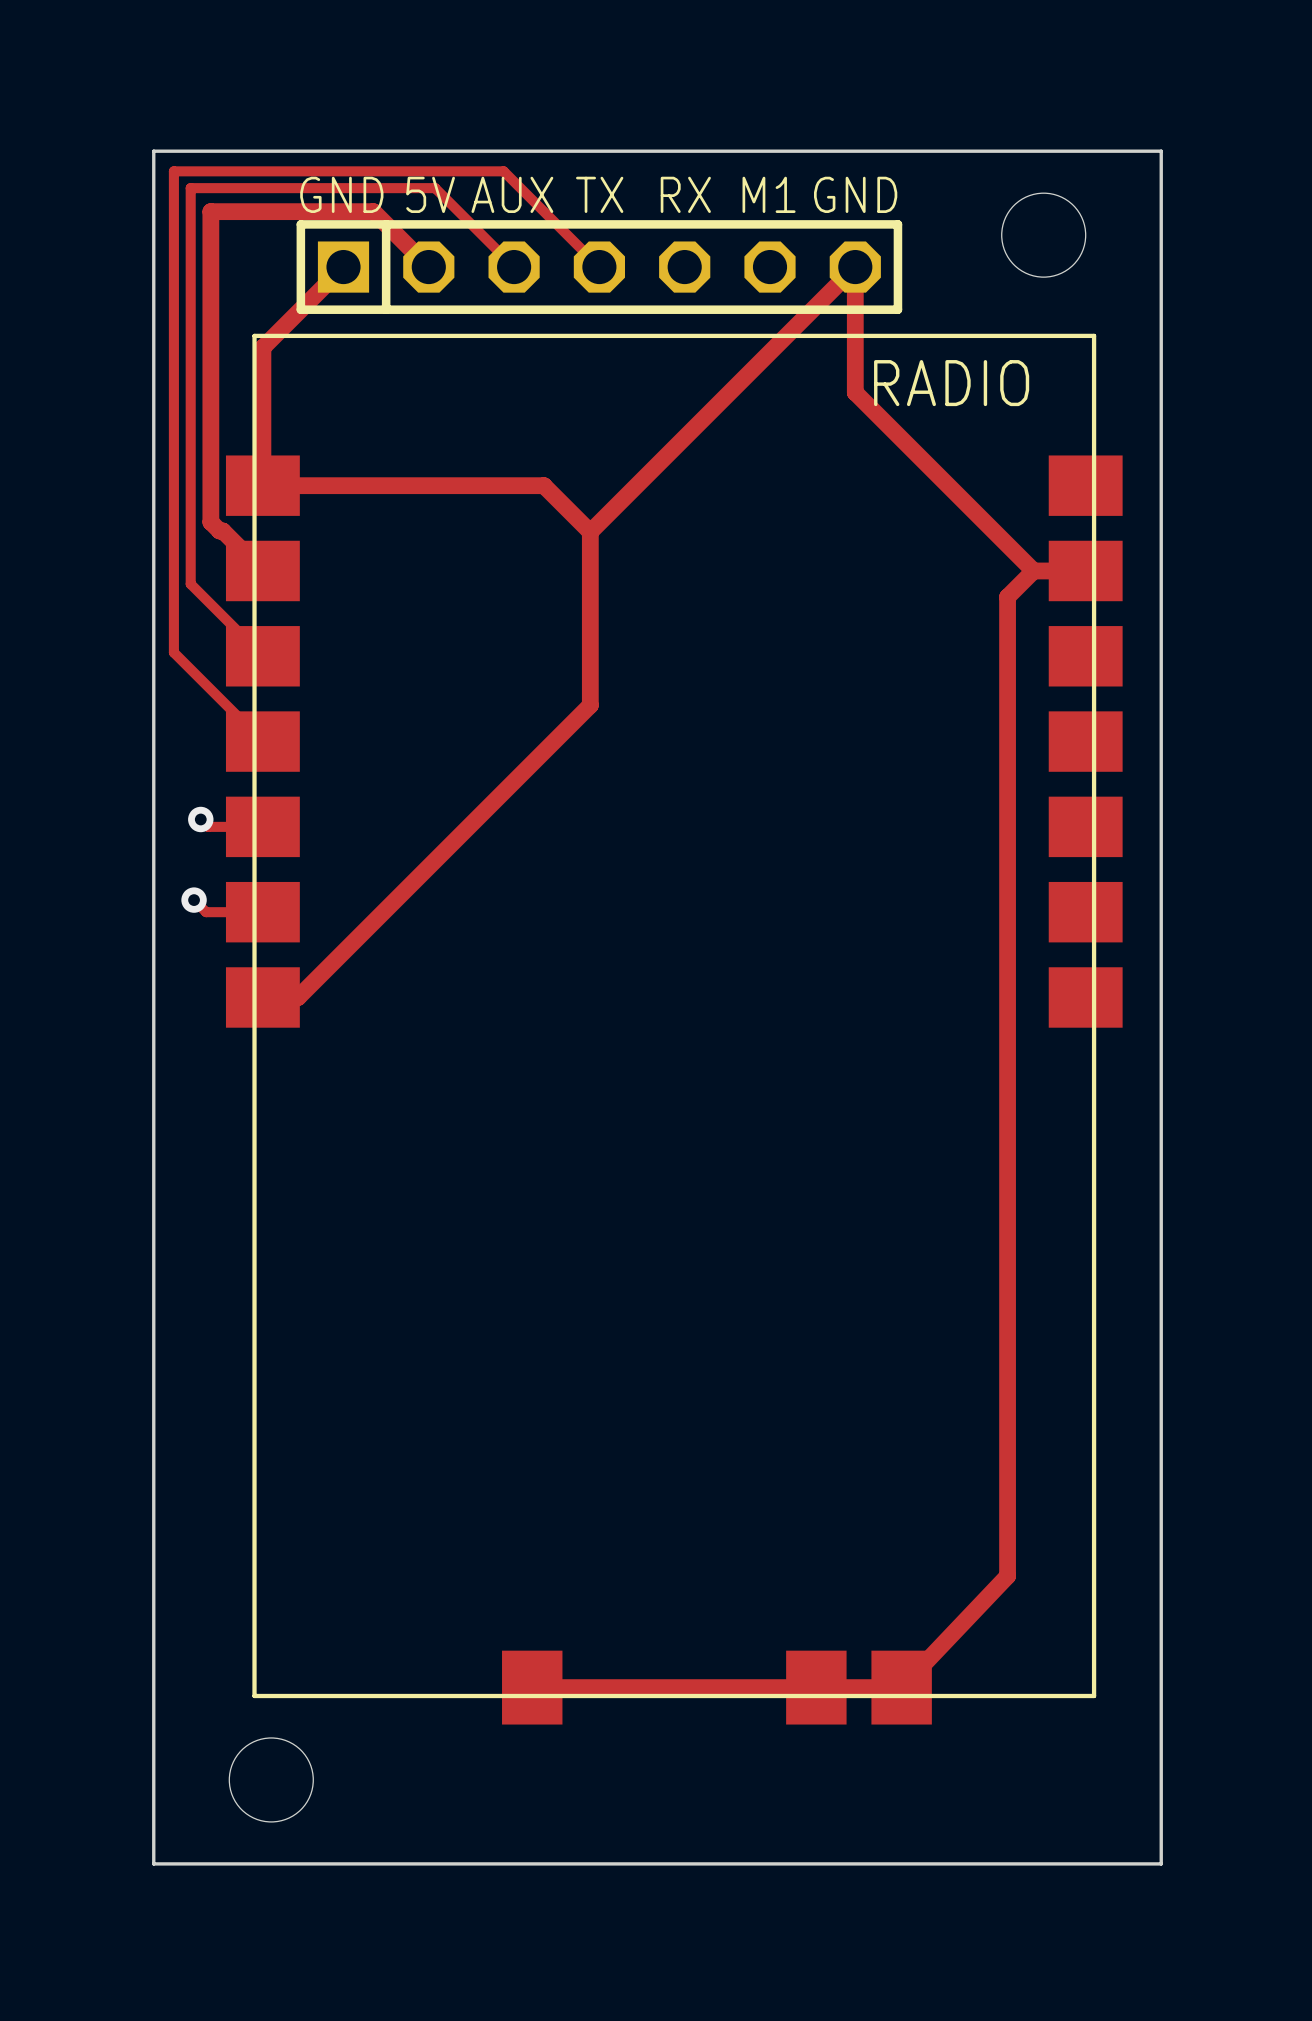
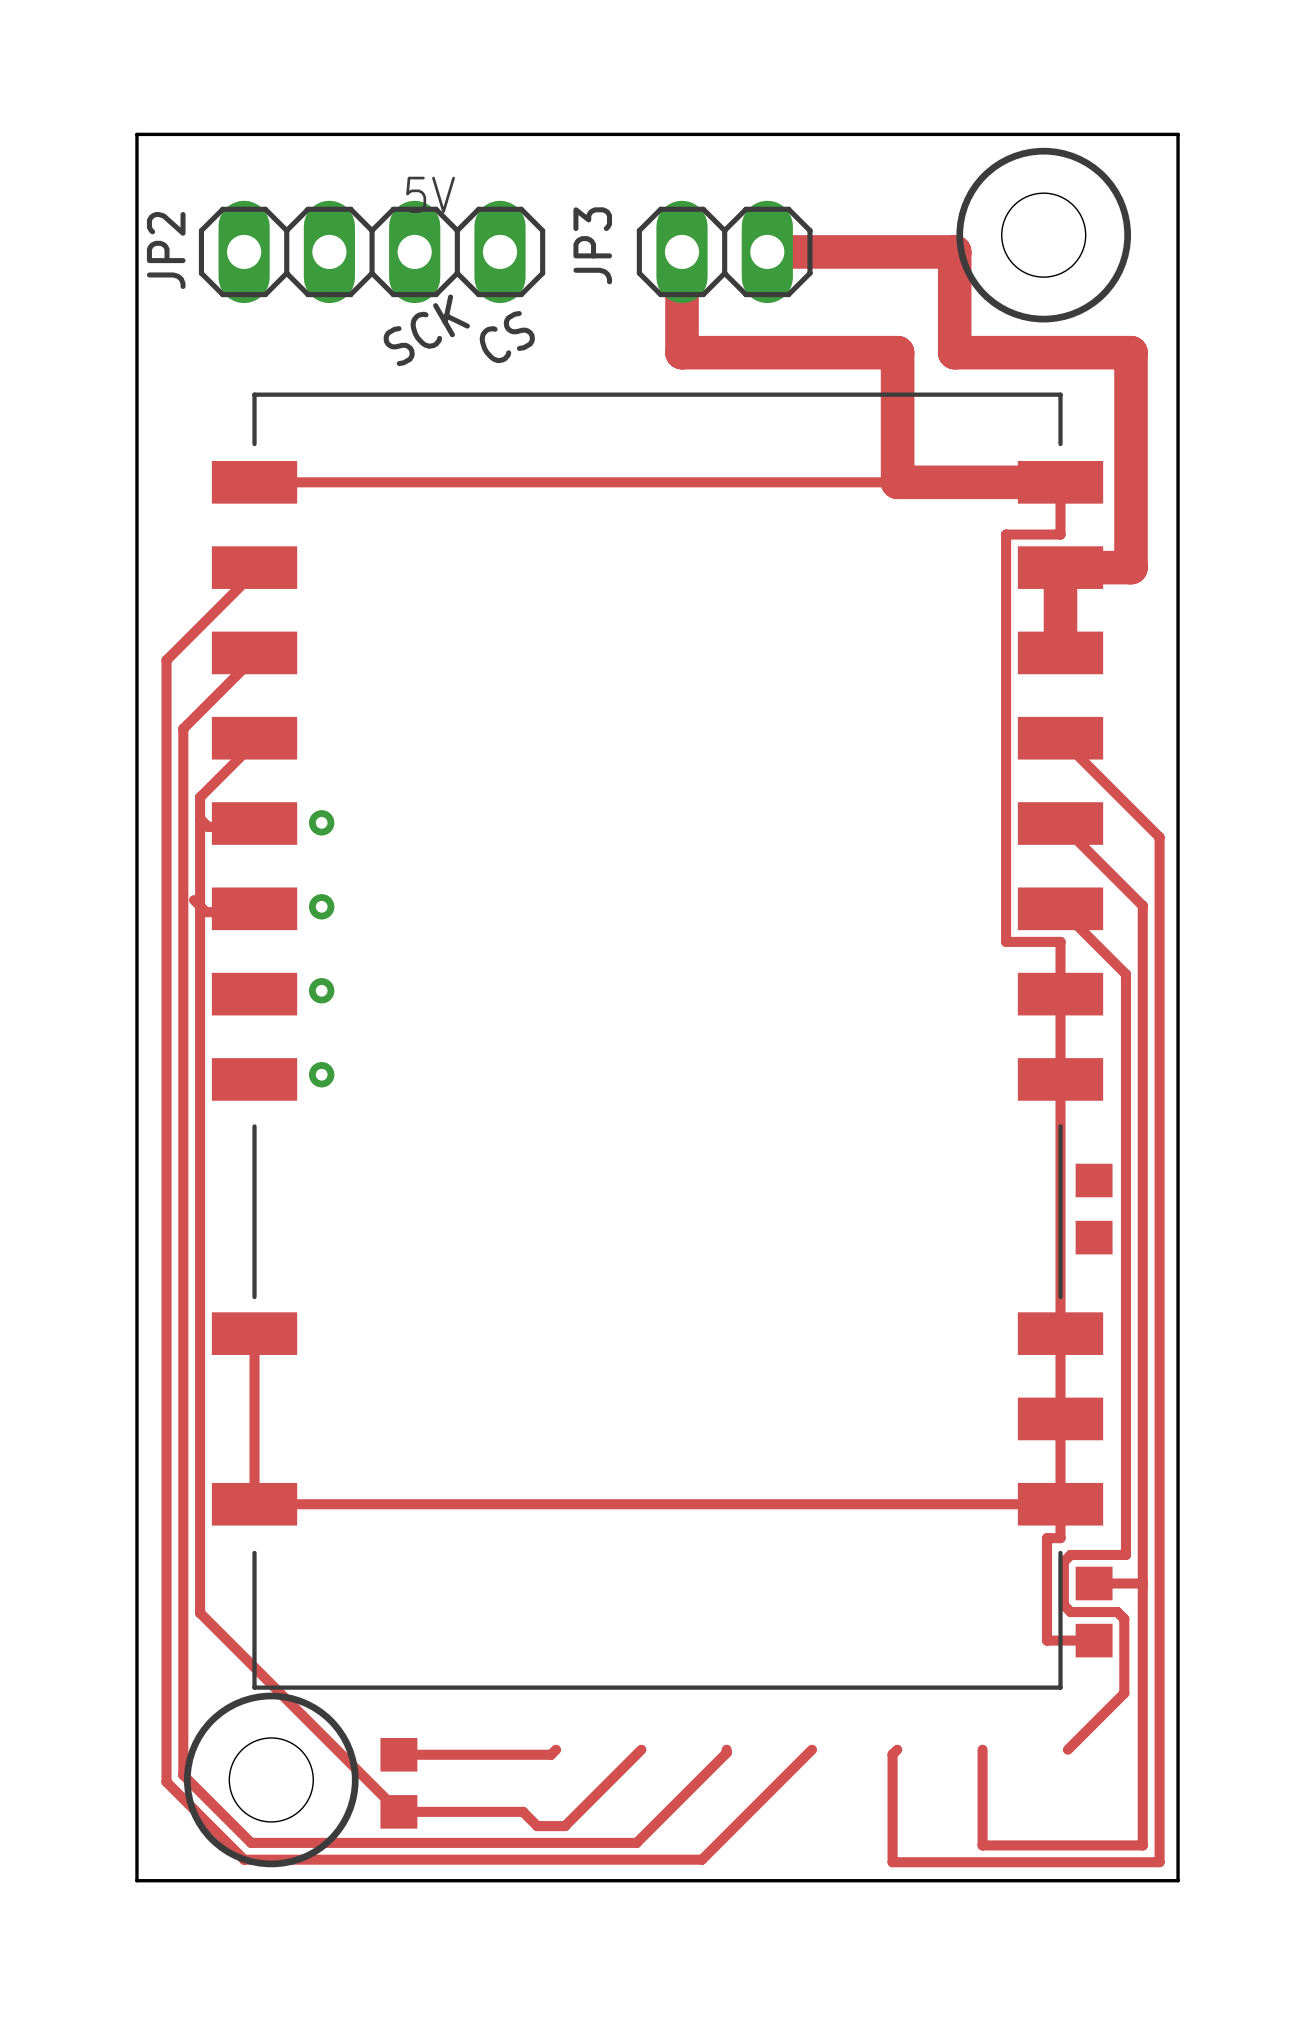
drawing: none -> [956, 147, 1132, 323]
board edge: (153, 151) (1161, 151) (1161, 1863) (153, 1863) (153, 151) -> (136, 134) (136, 1880) (1178, 1880) (1178, 134) (136, 134)
text: GND (341, 194) -> none
text: AUX (512, 194) -> none
text: TX (599, 194) -> none
text: RX (685, 194) -> none
text: M1 (769, 194) -> none
text: GND (855, 194) -> none
JP2: none -> (372, 251)
track: none -> (682, 251) (682, 352) (897, 352) (897, 482) (1060, 482)
JP3: none -> (724, 251)
track: none -> (767, 251) (954, 251) (954, 352) (1131, 352) (1131, 567) (1060, 567) (1060, 652)
track: (343, 267) (262, 347) (262, 485) (543, 485) (590, 532) -> none
track: (428, 267) (373, 211) (210, 211) (210, 522) (219, 531) (222, 531) (262, 570) -> none
track: (514, 267) (435, 188) (190, 188) (190, 584) (262, 656) -> none
track: (599, 267) (503, 171) (173, 171) (173, 652) (262, 741) -> none
part: (599, 267) -> none
text: none -> SCK (426, 330)
text: none -> CS (507, 337)
track: none -> (254, 482) (1060, 482)
track: none -> (1060, 482) (1060, 534) (1006, 534) (1006, 941) (1060, 941) (1060, 1538) (1047, 1538) (1047, 1640) (1094, 1640)
track: (590, 532) (855, 267) (855, 392) (1033, 570) (1007, 597) (1007, 1576) (901, 1687) (532, 1687) -> none
track: (590, 532) (590, 705) (298, 997) (262, 997) -> none
track: none -> (254, 567) (254, 572) (166, 660) (166, 1782) (244, 1859) (702, 1859) (811, 1749)
track: none -> (254, 652) (254, 657) (183, 728) (183, 1775) (251, 1842) (636, 1842) (726, 1752) (726, 1749)
track: none -> (254, 738) (254, 742) (200, 797) (200, 1613) (398, 1811) (523, 1811) (537, 1826) (565, 1826) (641, 1749)
track: none -> (1060, 738) (1159, 837) (1159, 1862) (892, 1862) (892, 1754) (897, 1749)
via: (200, 819) -> none
via: none -> (321, 822)
track: none -> (1060, 823) (1142, 905) (1142, 1845) (982, 1845) (982, 1749)
via: (194, 900) -> none
via: none -> (321, 906)
track: none -> (1060, 908) (1125, 974) (1125, 1554) (1070, 1554) (1063, 1561) (1063, 1605) (1070, 1612) (1117, 1612) (1124, 1618) (1124, 1693) (1067, 1749)
via: none -> (321, 990)
RADIO: (674, 1029) -> none
part: none -> (657, 1041)
via: none -> (321, 1074)
part: none -> (1094, 1209)
track: none -> (254, 1333) (254, 1504) (1050, 1504) (1060, 1494)
track: none -> (1094, 1583) (1142, 1583)
part: none -> (1094, 1612)
drawing: none -> [183, 1692, 359, 1868]
track: none -> (556, 1749) (551, 1754) (398, 1754)
part: none -> (398, 1783)

